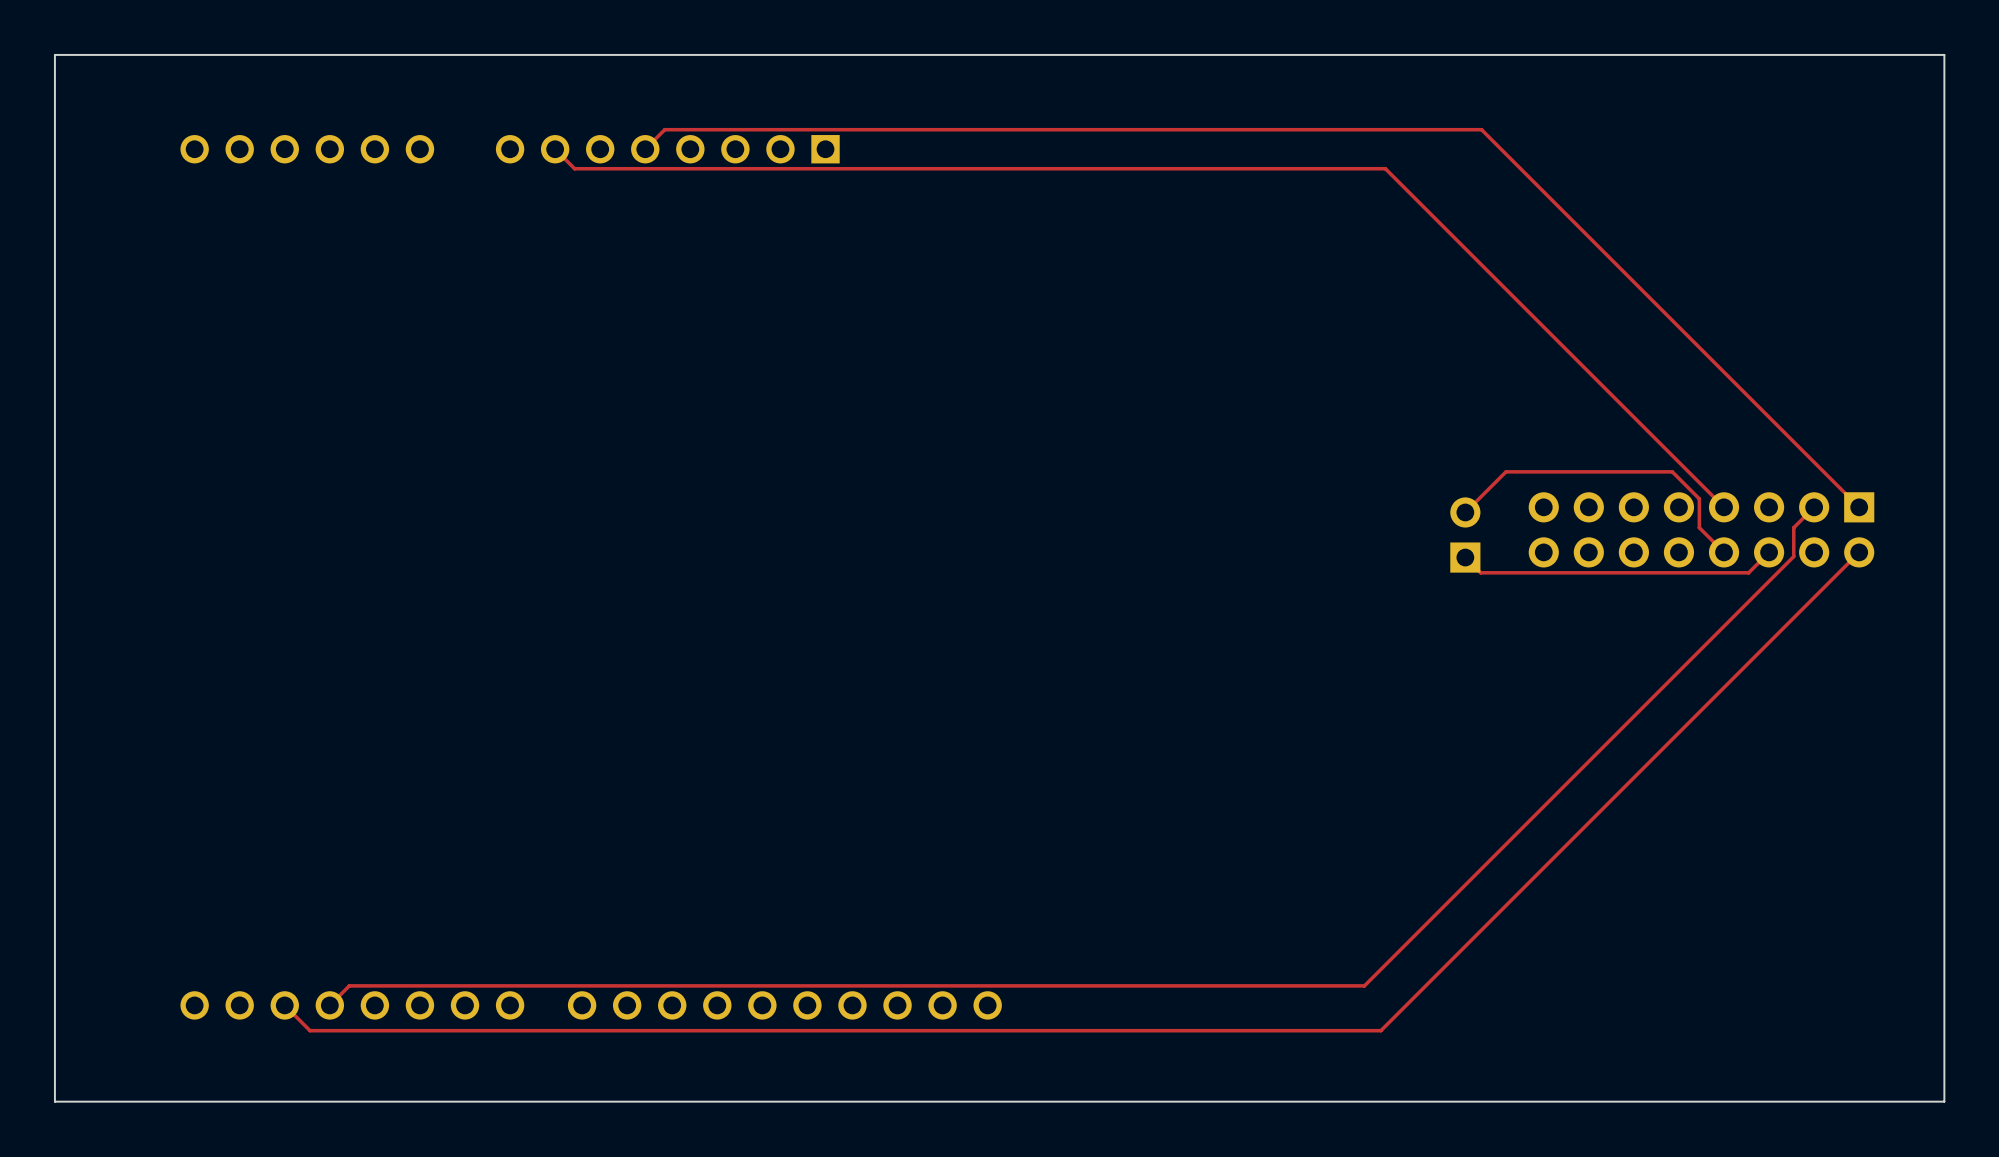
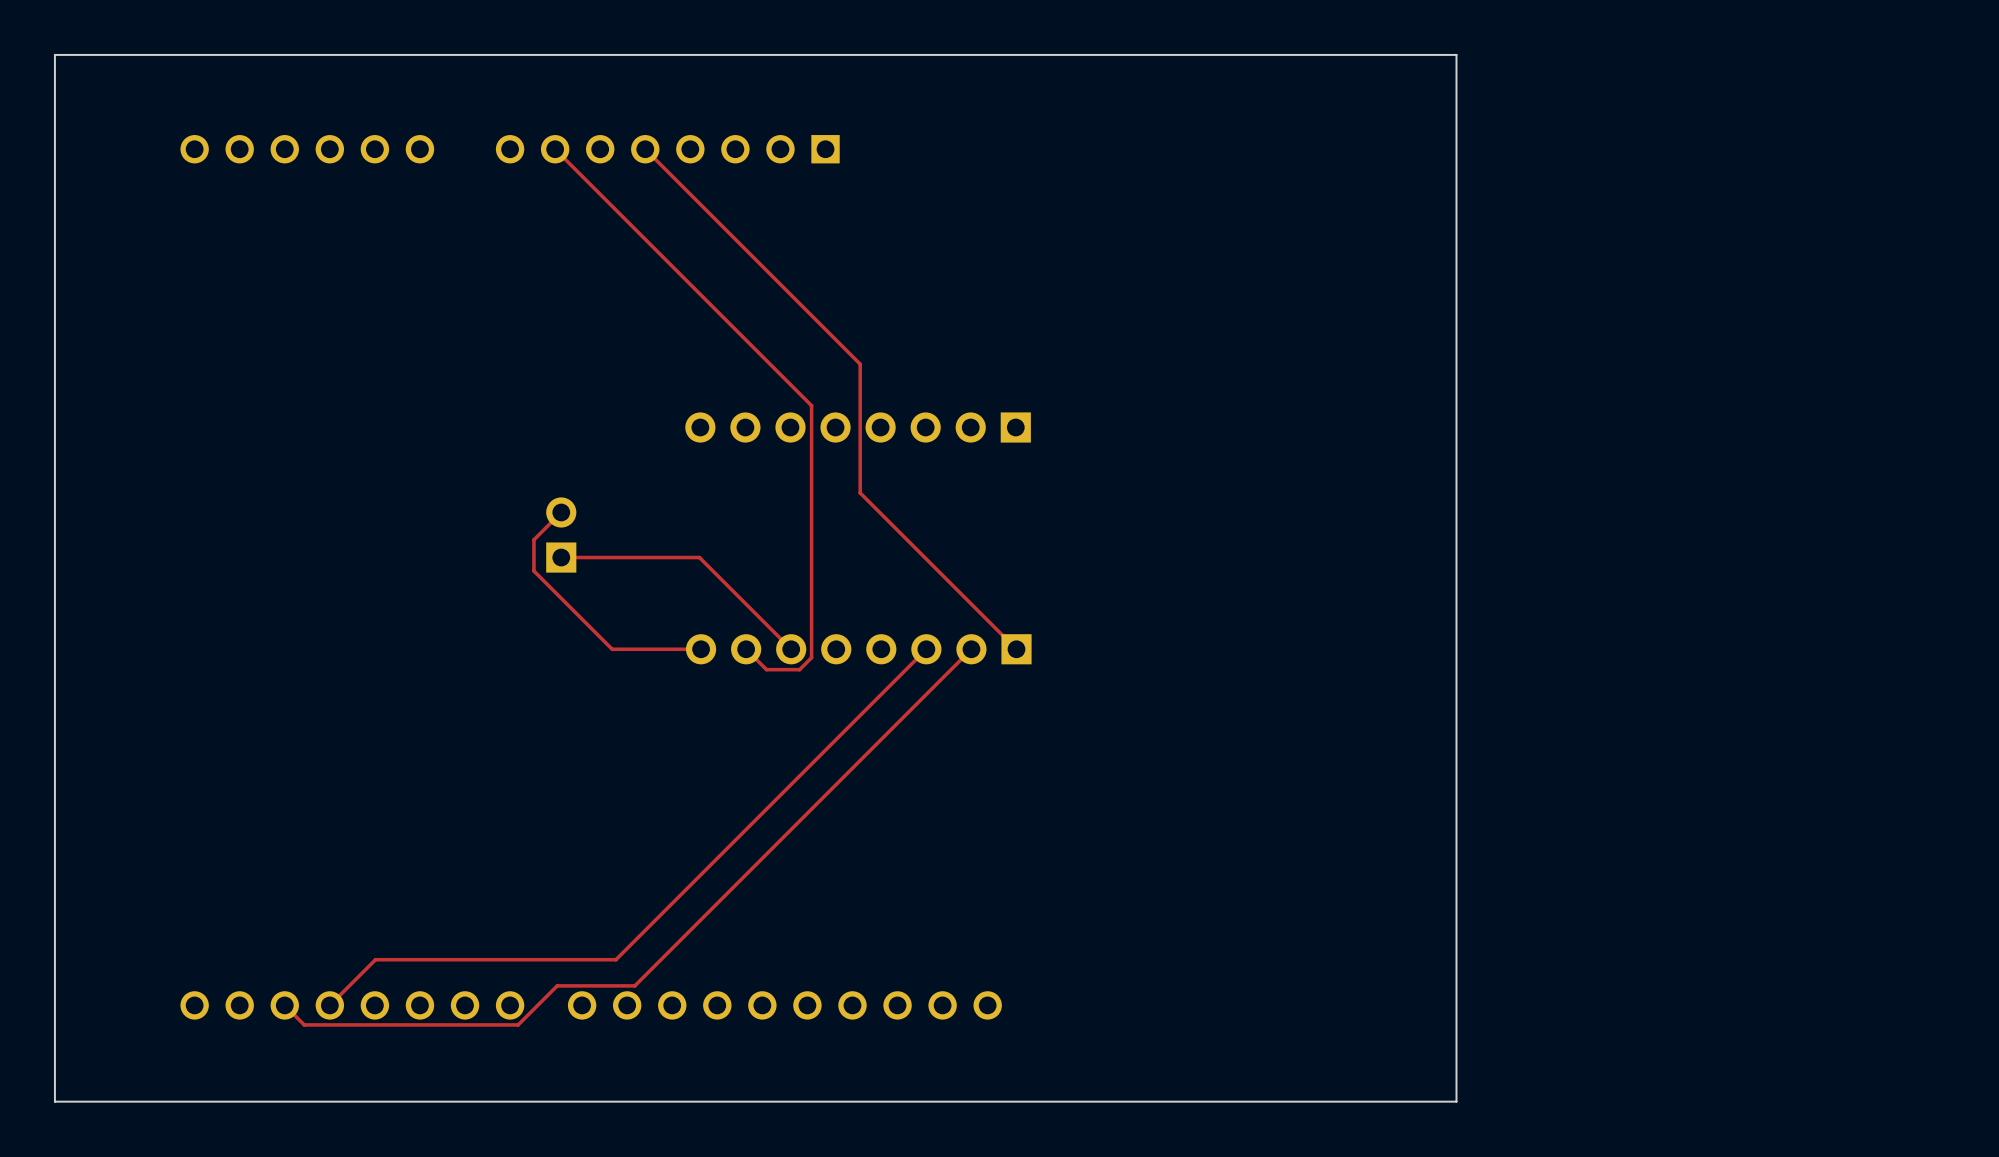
board edge: (1456, 54) (1944, 54) (1944, 1101) (1456, 1101) -> (1456, 54) (1456, 1101)
top track: (645, 149) (664, 129) (1481, 129) (1859, 507) -> (645, 149) (860, 364) (860, 492) (1016, 649)
top track: (574, 168) (1385, 168) (1724, 507) -> (574, 168) (811, 405) (811, 657) (799, 669) (766, 669) (746, 649)
part: none -> (858, 427)
top track: (1814, 507) (1793, 527) (1793, 556) (1364, 985) (634, 985) -> (971, 649) (634, 985)
top track: none -> (561, 512) (533, 539) (533, 571) (612, 649) (701, 649)
top track: (1465, 512) (1505, 471) (1672, 471) (1699, 498) (1699, 527) (1724, 552) -> none
part: (1701, 529) -> none
part: none -> (561, 535)
part: (1465, 535) -> none
top track: (1769, 552) (1748, 572) (1480, 572) (1465, 557) -> none
top track: (1859, 552) (1380, 1030) (310, 1030) (304, 1024) -> none
top track: none -> (561, 557) (699, 557) (791, 649)
part: none -> (858, 649)
top track: none -> (926, 649) (615, 959) (375, 959) (349, 985)
top track: (557, 985) (349, 985) -> (557, 985) (518, 1024) (304, 1024)

